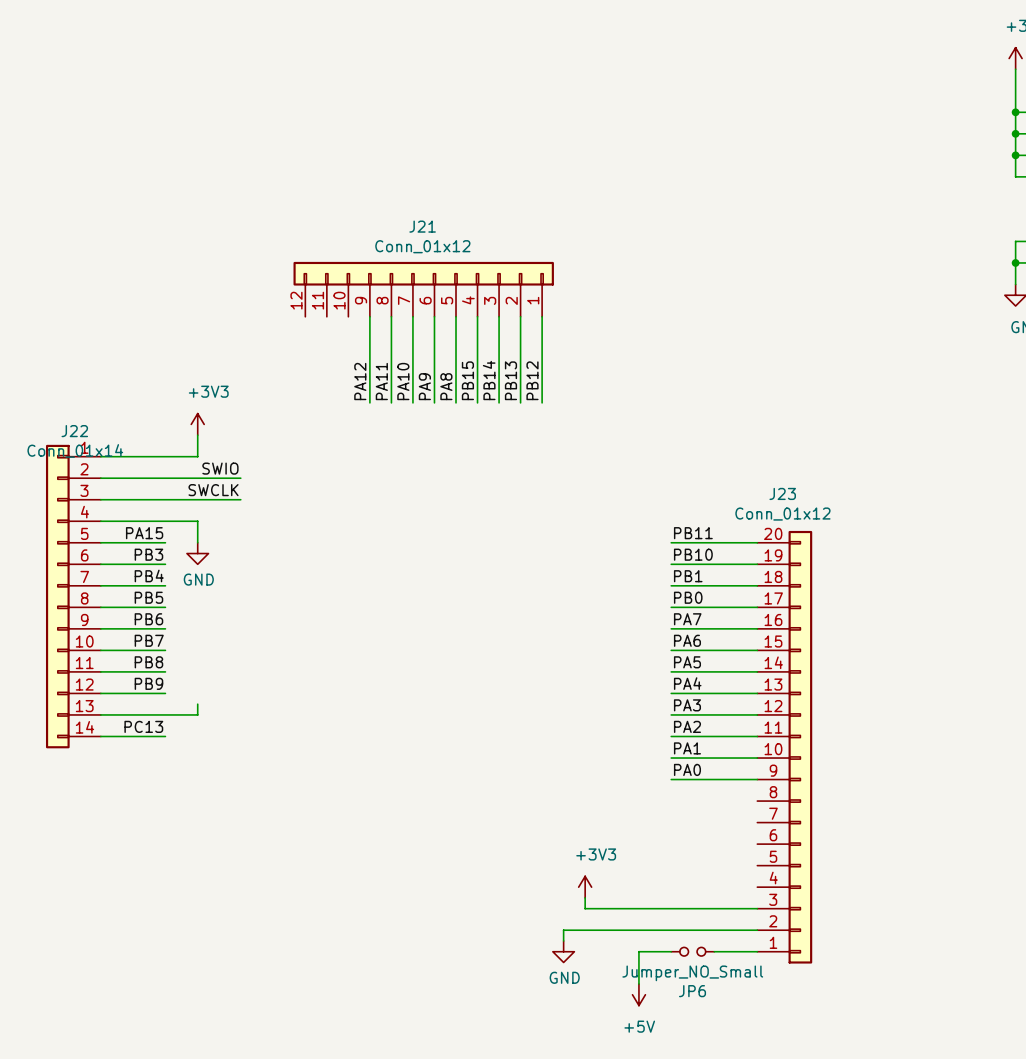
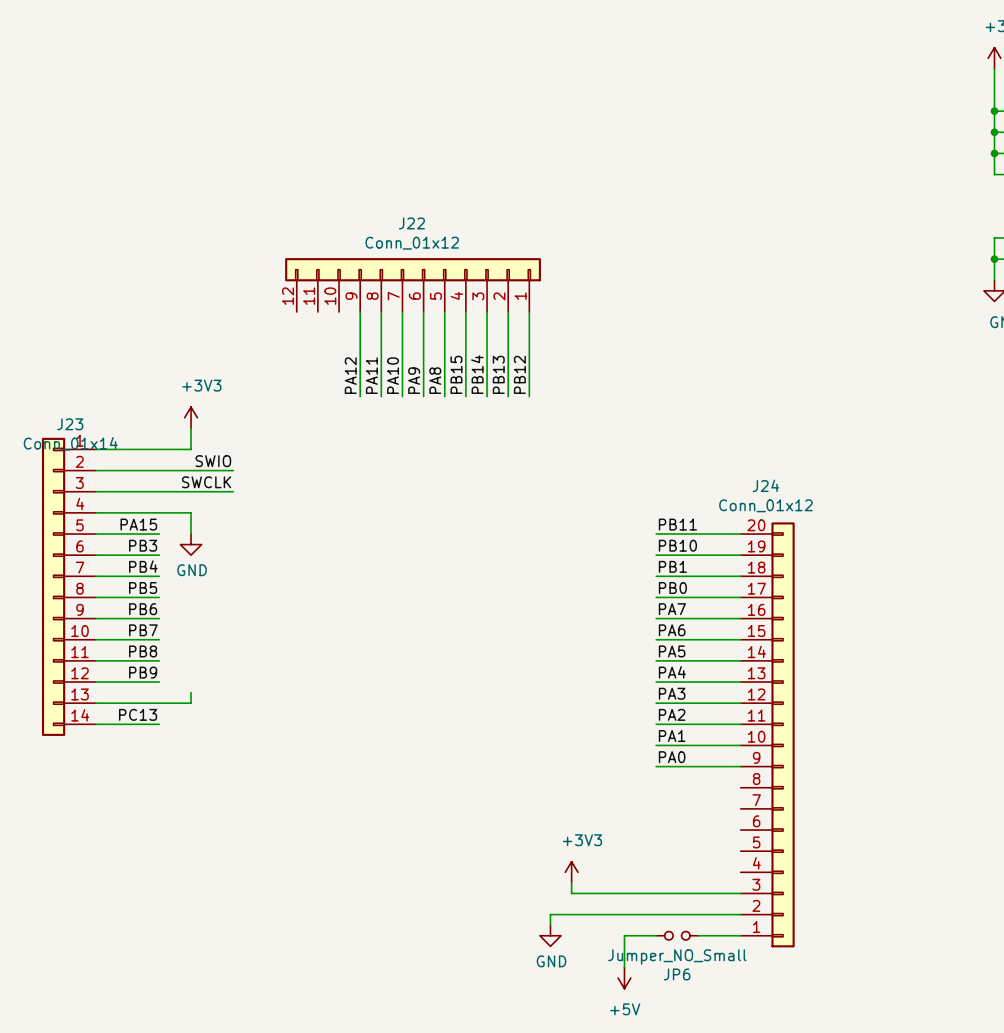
J21 name: J21 (422, 226) -> J22 (411, 223)
J22 name: J22 (74, 431) -> J23 (70, 424)
J23 name: J23 (782, 493) -> J24 (765, 485)

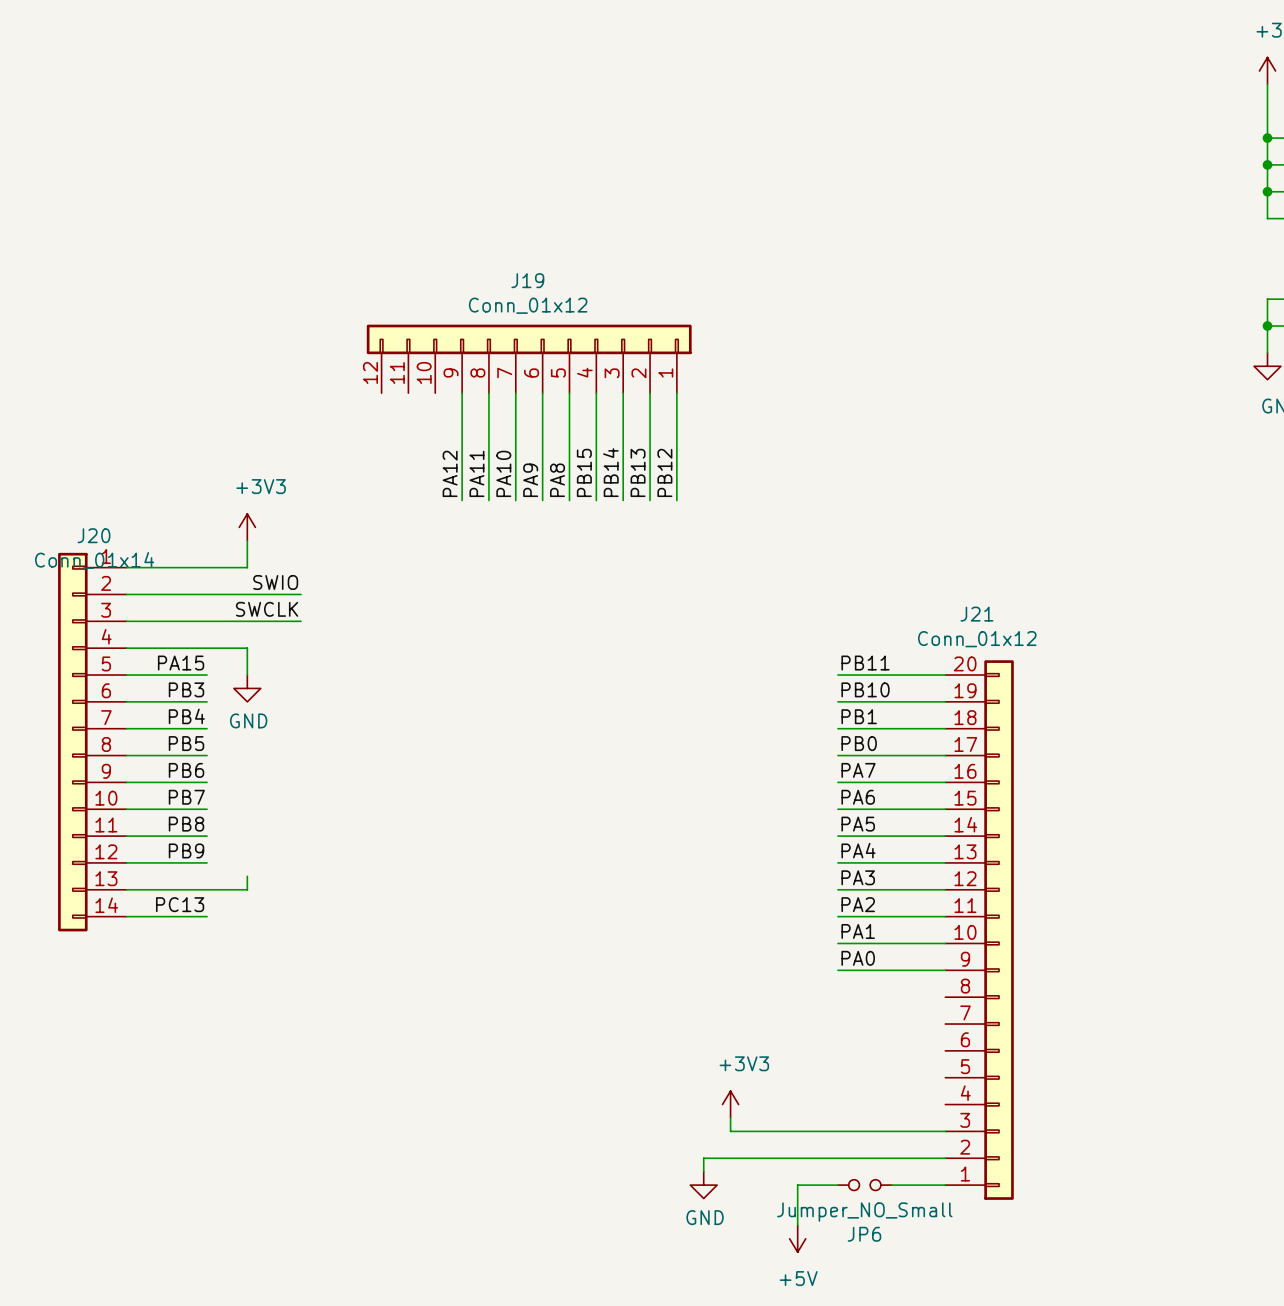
J22 name: J22 (411, 223) -> J19 (527, 280)
J23 name: J23 (70, 424) -> J20 (93, 535)
J24 name: J24 (765, 485) -> J21 (976, 614)

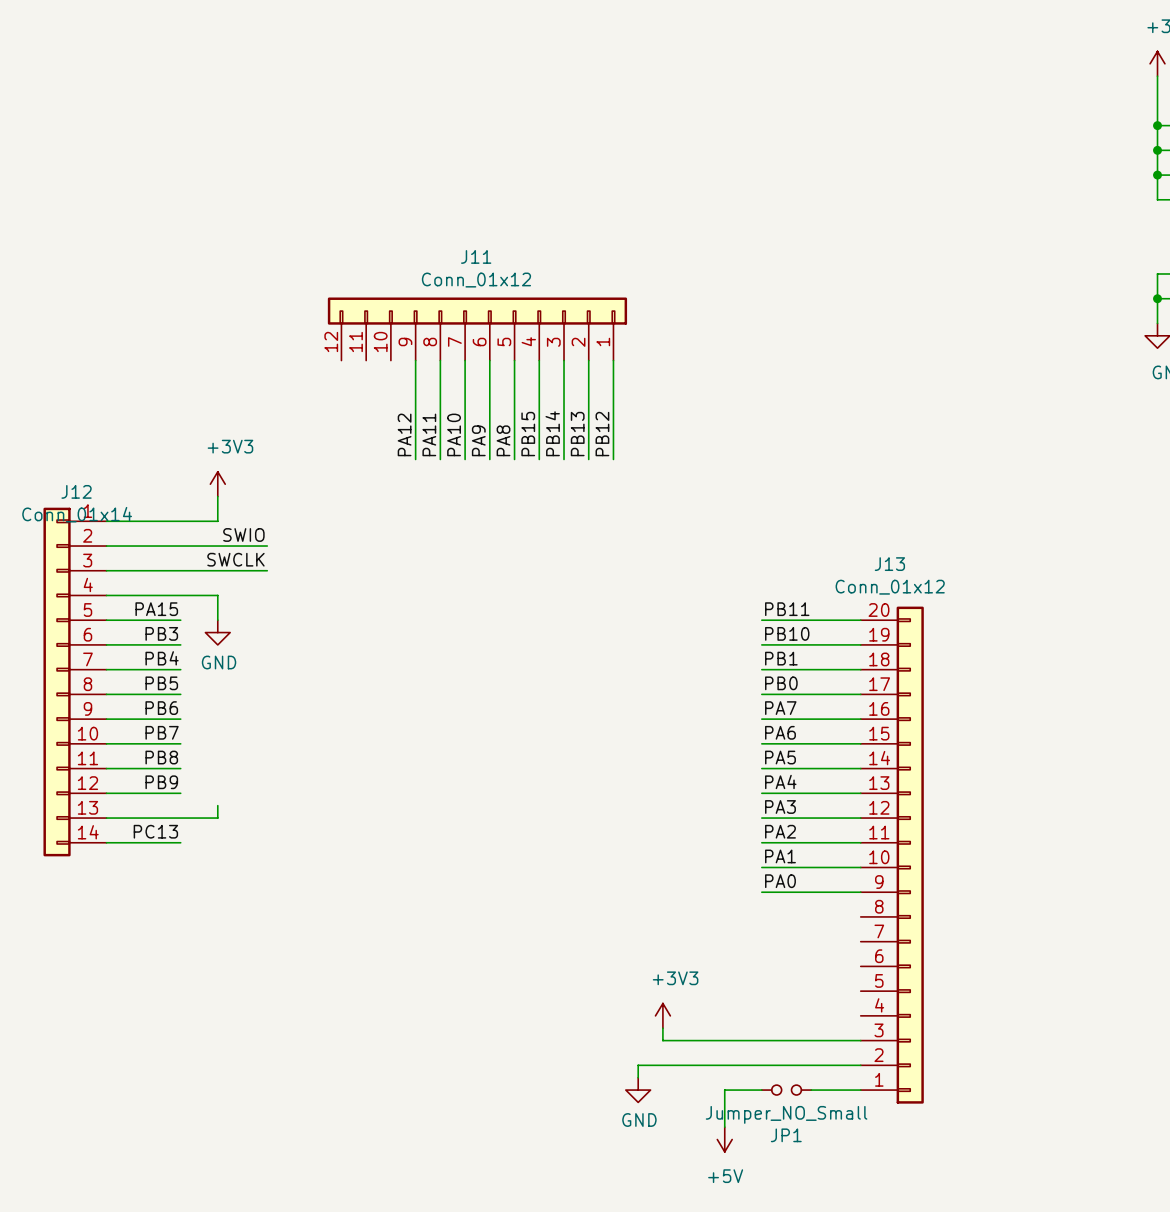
J19 name: J19 (527, 280) -> J11 (476, 256)
J20 name: J20 (93, 535) -> J12 (76, 491)
J21 name: J21 (976, 614) -> J13 (889, 564)
JP6 name: JP6 (864, 1234) -> JP1 (786, 1135)

